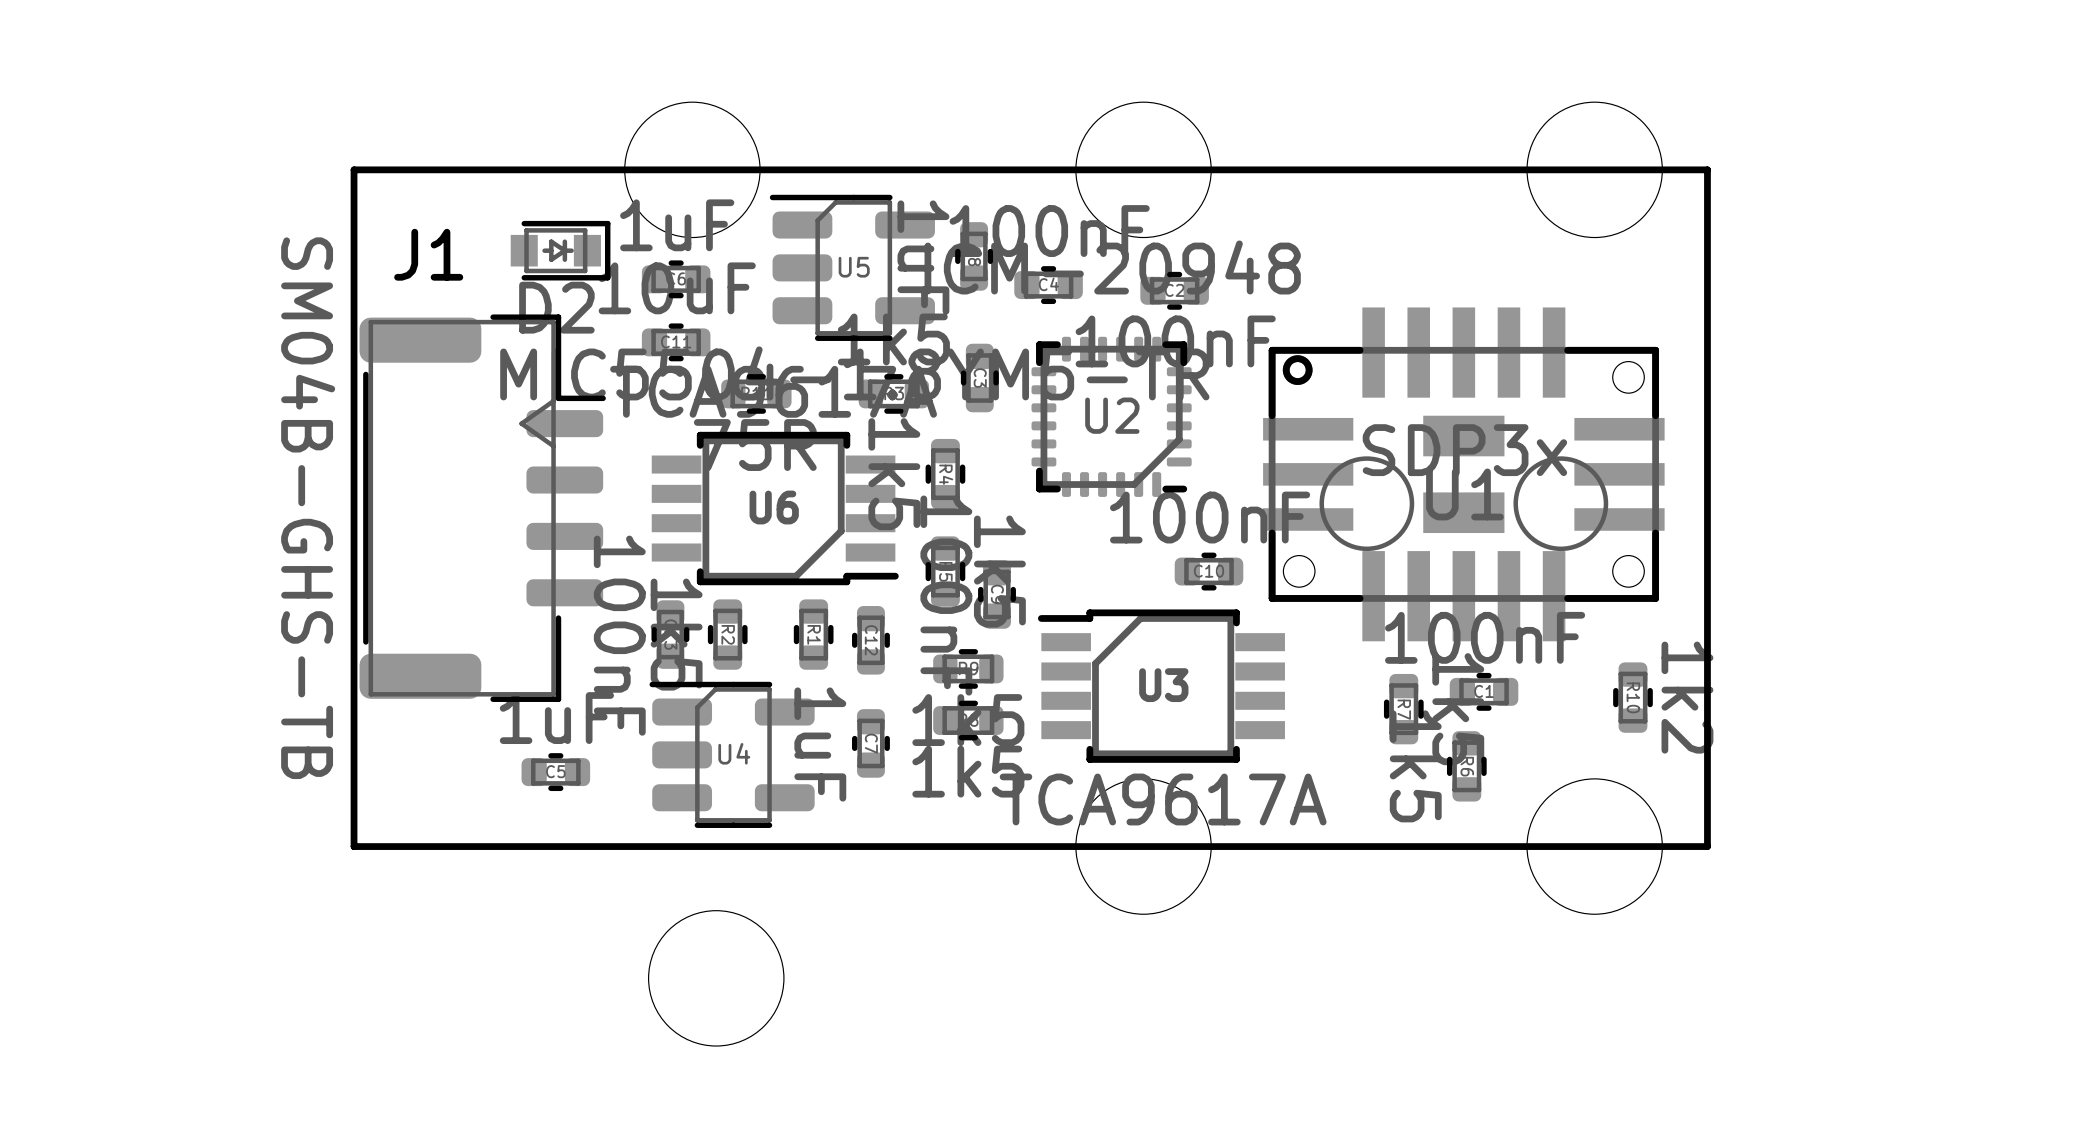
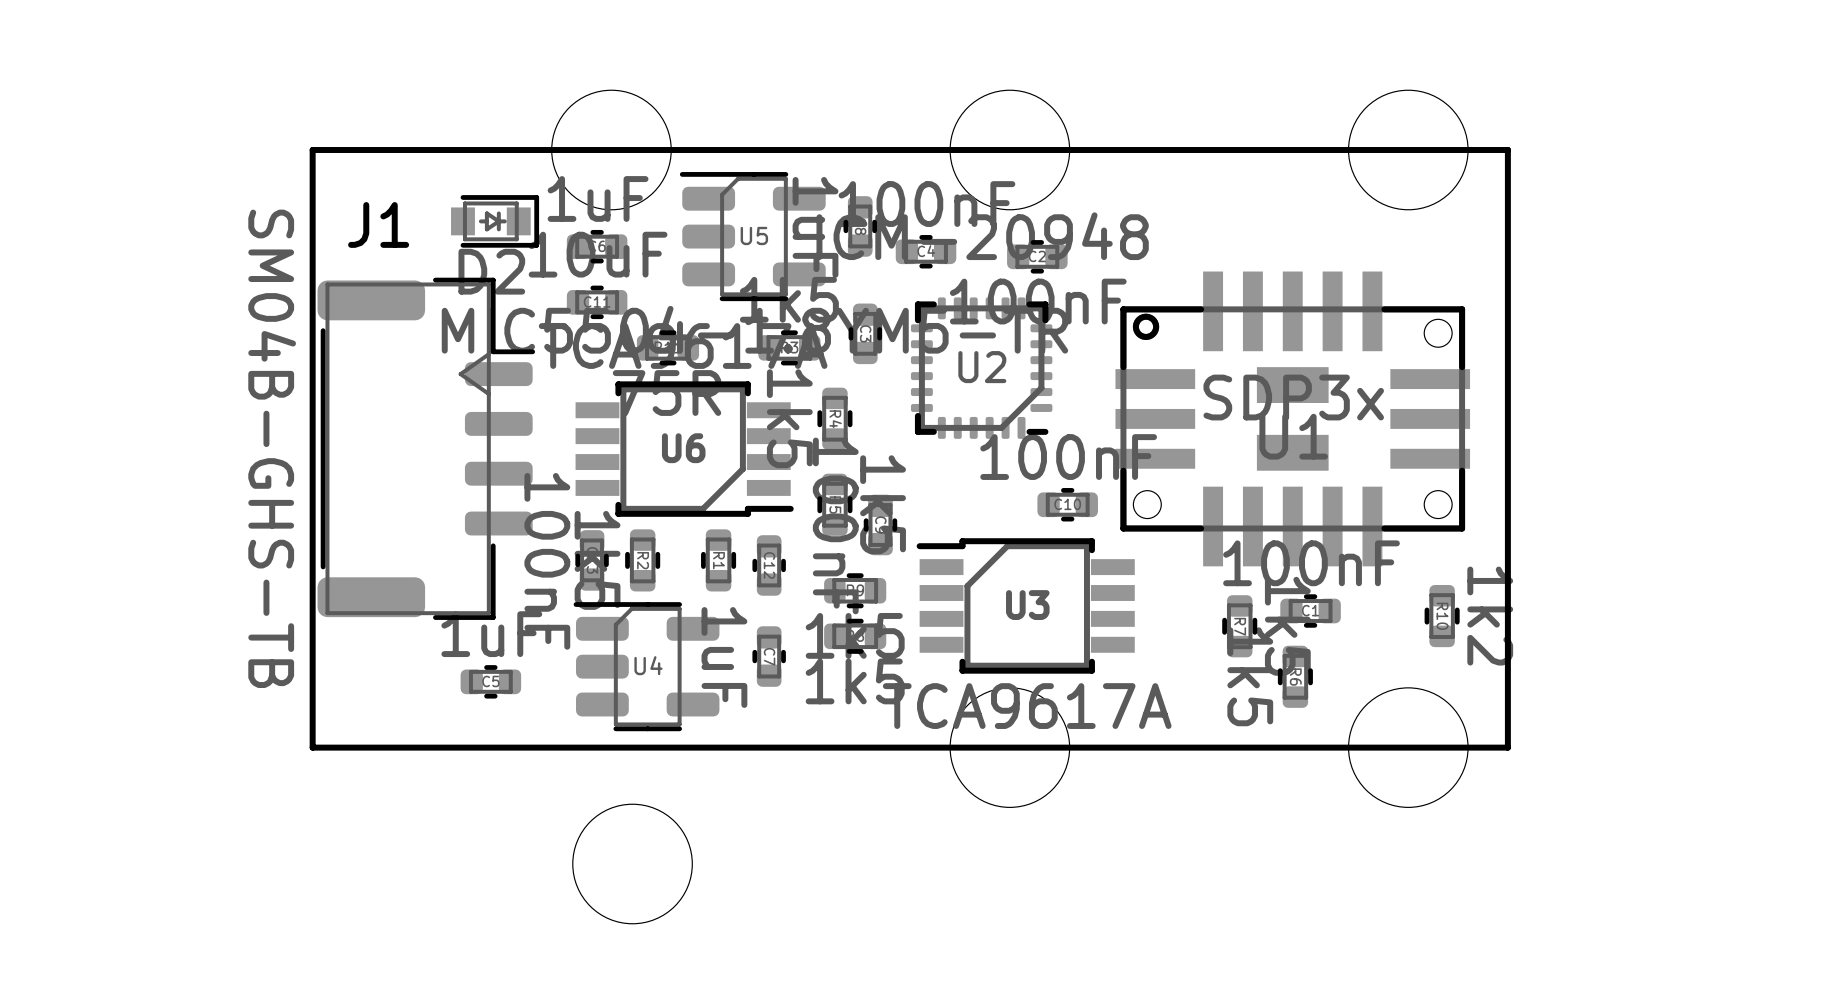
part footprint: [1263, 307, 1665, 642] -> [1115, 271, 1471, 567]

